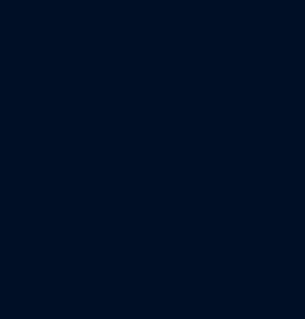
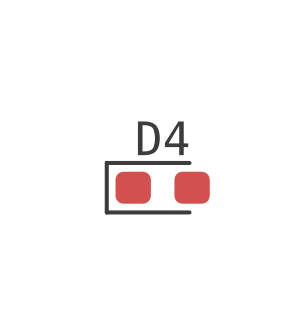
D4: none -> (157, 187)

